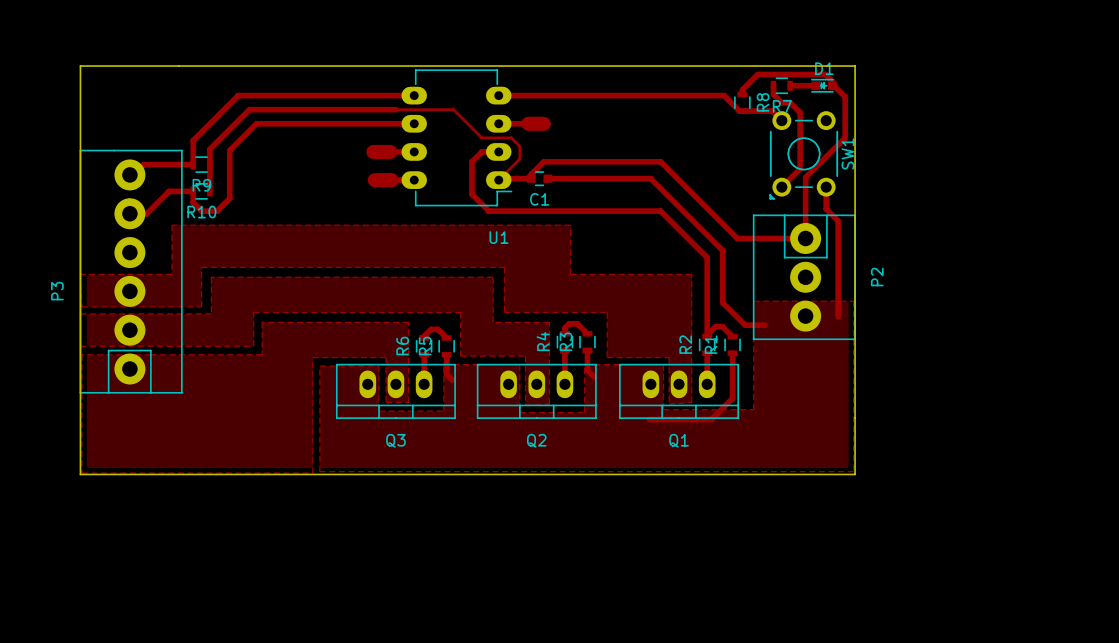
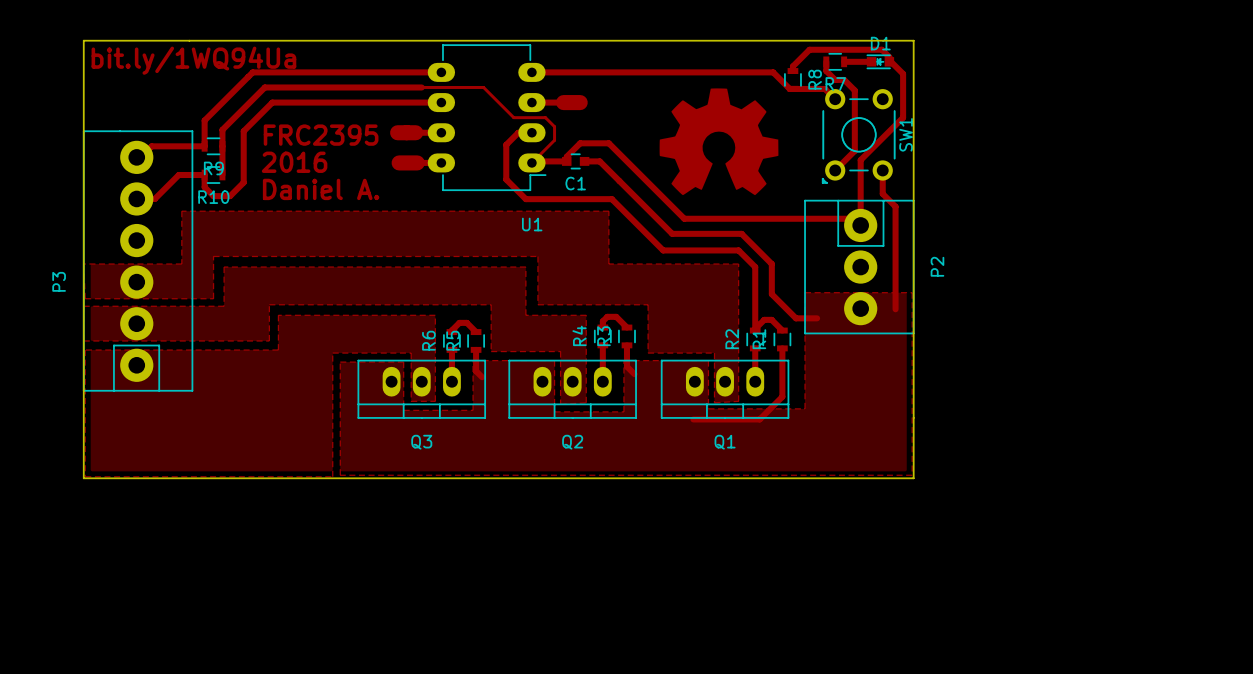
text: none -> bit.ly/1WQ94Ua (193, 60)
drawing: none -> [659, 88, 779, 196]
top track: (486, 151) (481, 151) (471, 161) (471, 194) (488, 211) (660, 211) (707, 257) (707, 277) -> (518, 132) (506, 144) (506, 179) (525, 199) (611, 199) (663, 250) (738, 250) (755, 267)
text: none -> FRC2395 (321, 135)
top track: (570, 161) (660, 161) (737, 238) (805, 238) (805, 232) -> (608, 143) (684, 218) (860, 218)
top track: (562, 178) (650, 178) (722, 250) (722, 274) -> (599, 161) (672, 233) (741, 233) (771, 264)
text: none -> 2016 (294, 162)
text: none -> Daniel A. (321, 189)

